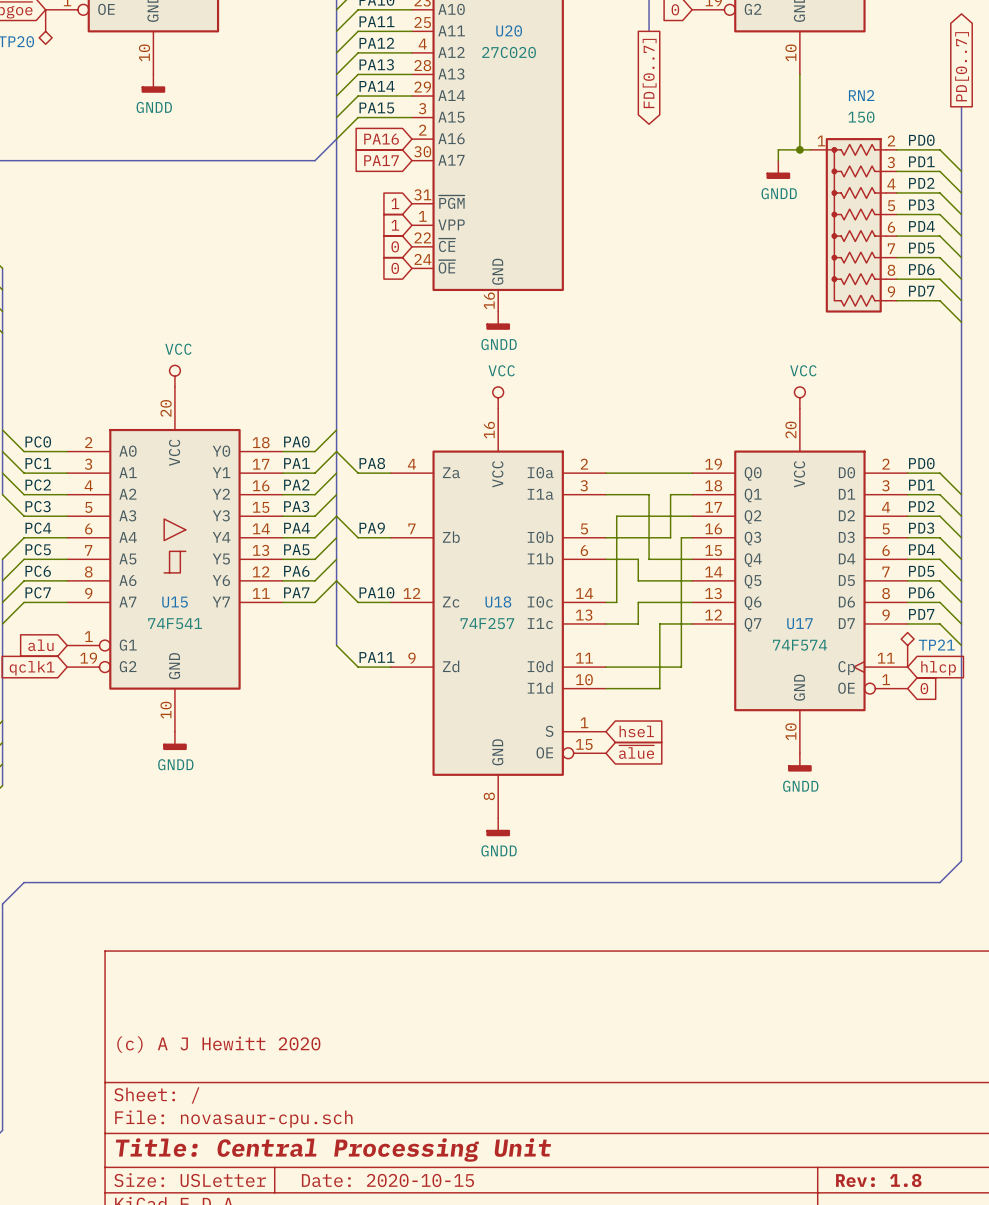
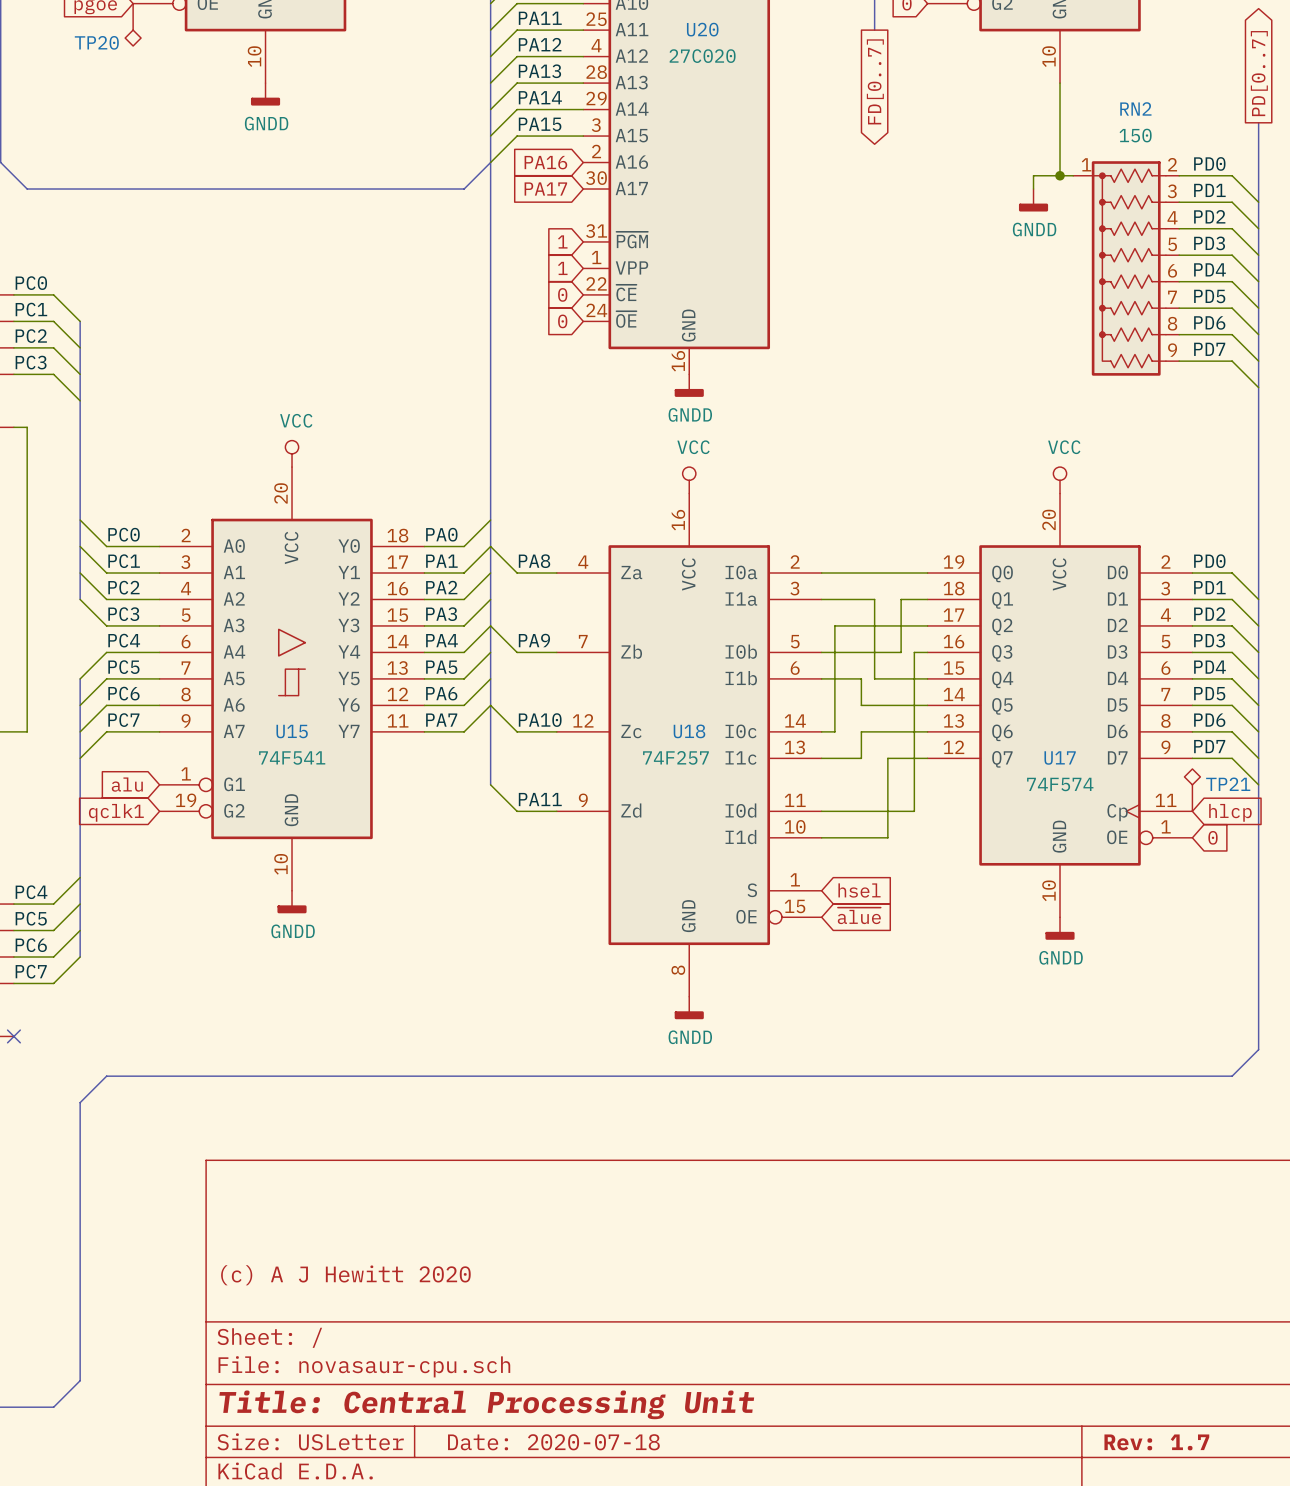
title block: Date: 2020-10-15 (387, 1180) -> Date: 2020-07-18 (553, 1442)
title block: Rev: 1.8 (878, 1180) -> Rev: 1.7 (1156, 1442)

